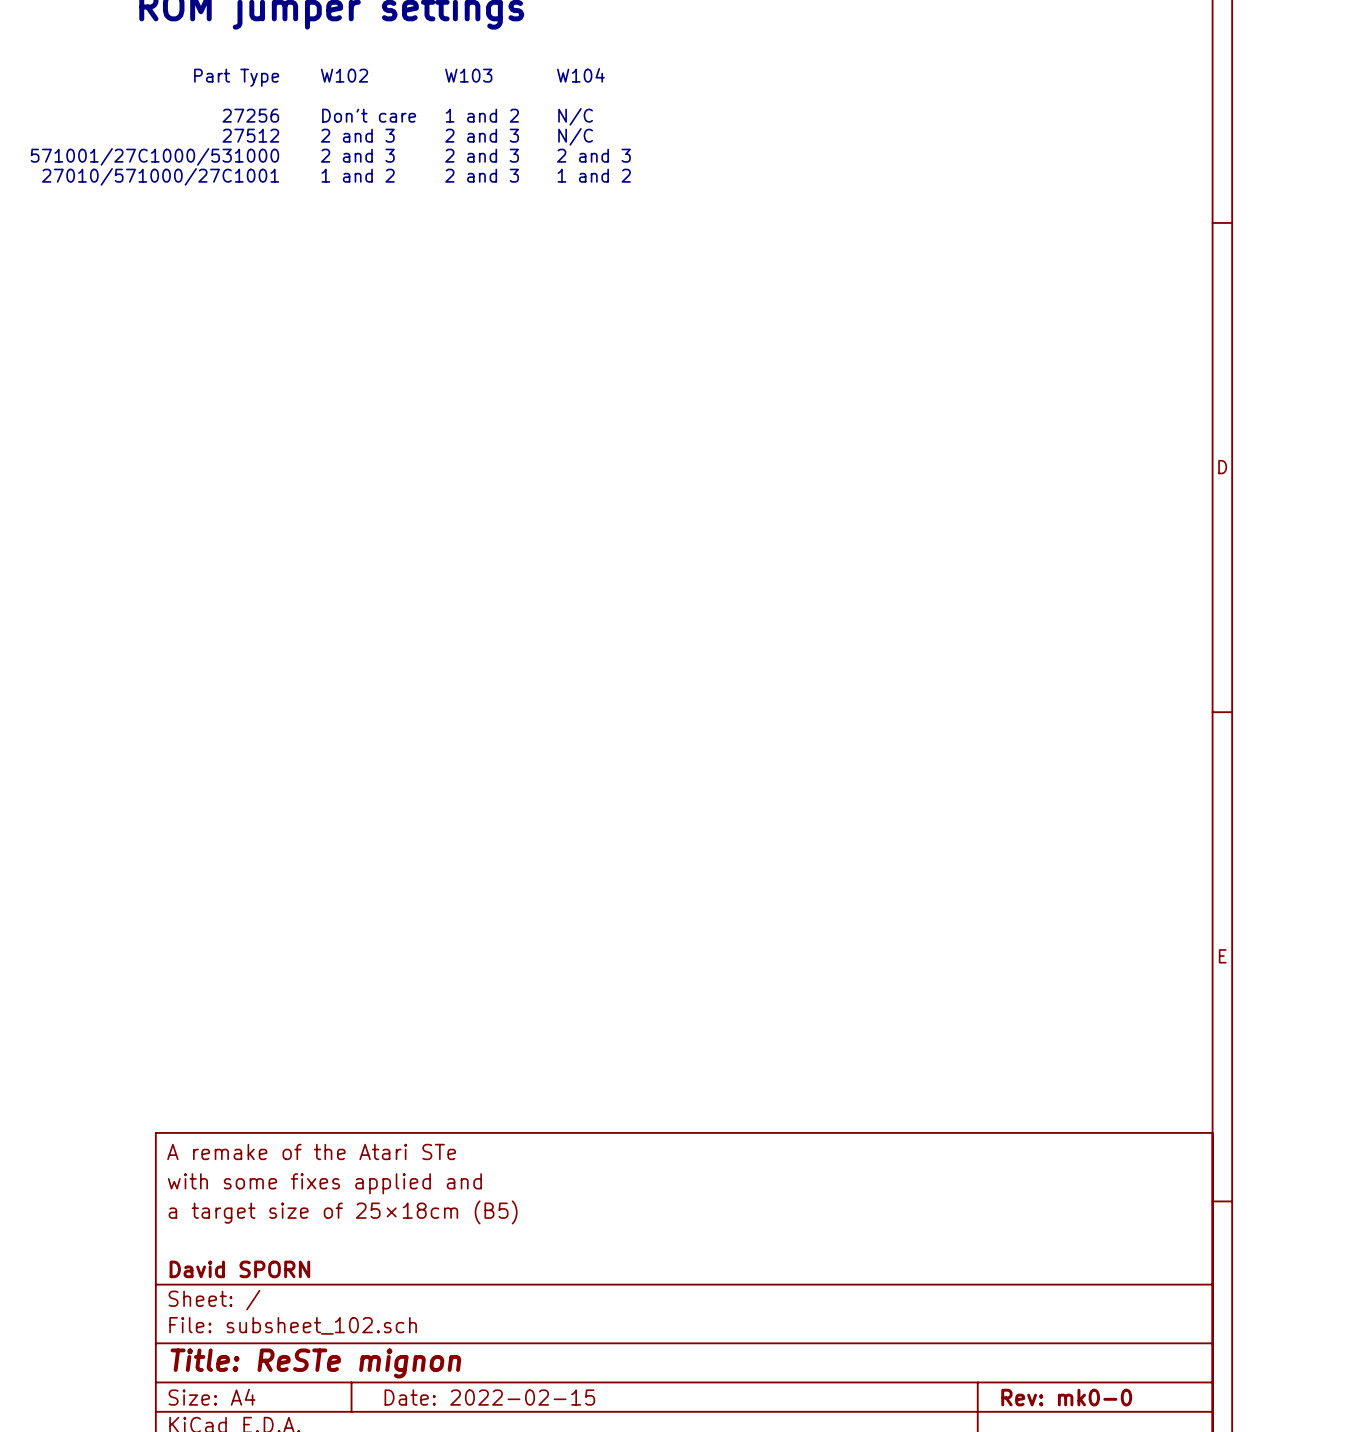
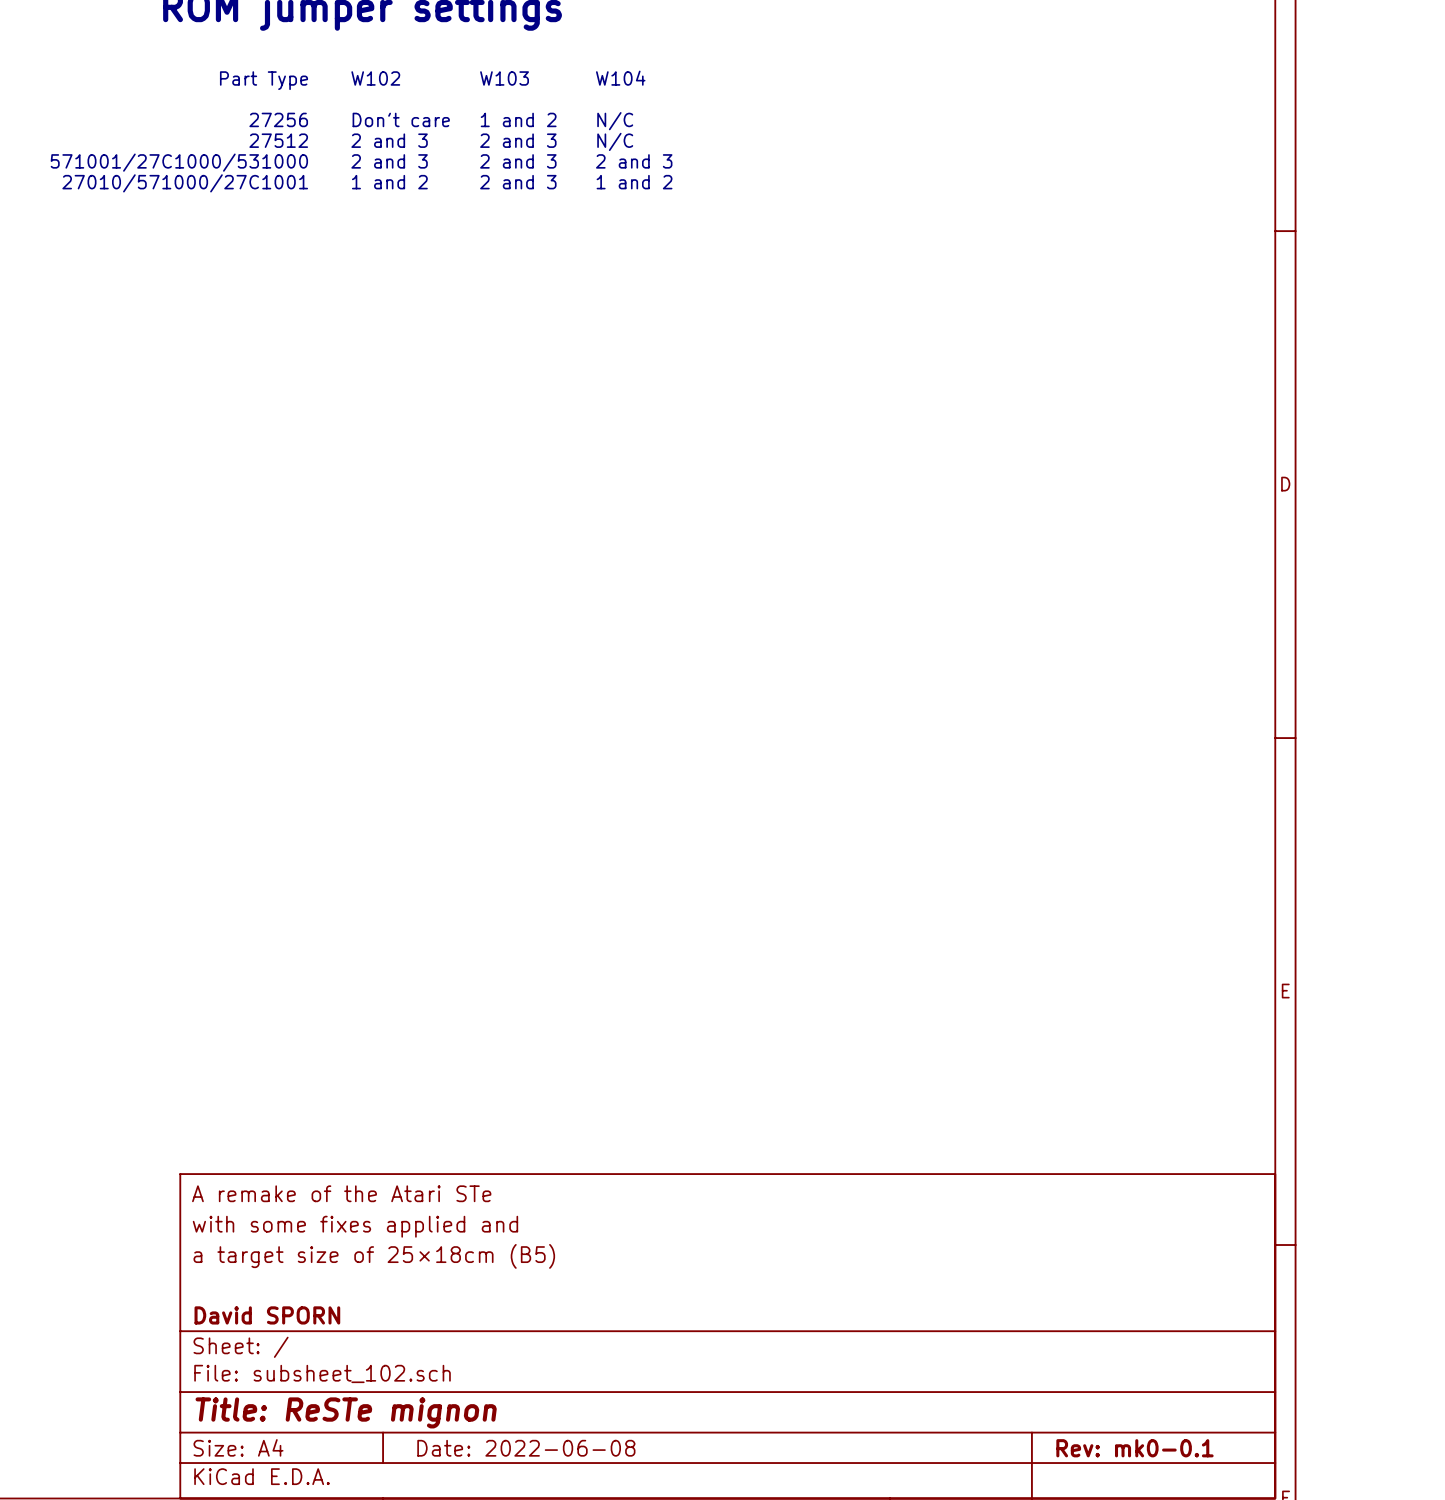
title block: Date: 2022-02-15 (489, 1397) -> Date: 2022-06-08 (526, 1448)
title block: Rev: mk0-0 (1066, 1397) -> Rev: mk0-0.1 (1134, 1448)

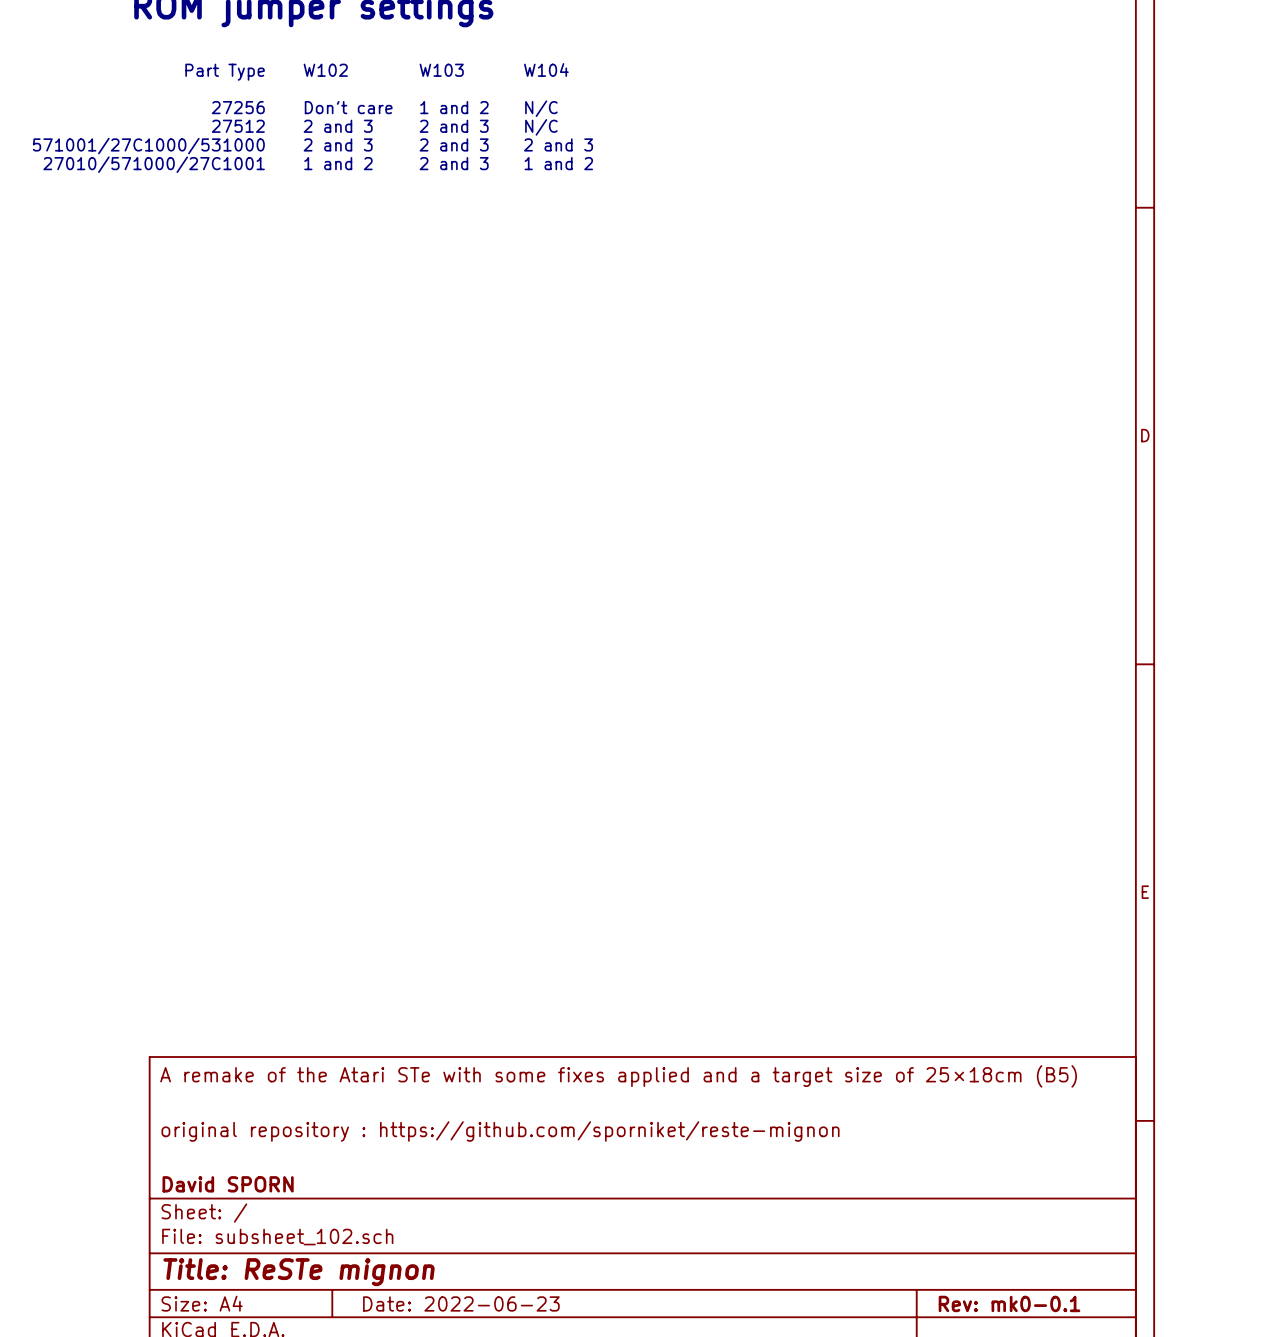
title block: A remake of the Atari STe (341, 1193) -> A remake of the Atari STe with some fixes applied and a target size of 25×18cm (B5) (618, 1076)
title block: with some fixes applied and (355, 1226) -> none
title block: a target size of 25×18cm (B5) (374, 1256) -> original repository : https://github.com/sporniket/reste-mignon (500, 1131)
title block: Date: 2022-06-08 (526, 1448) -> Date: 2022-06-23 (461, 1303)

